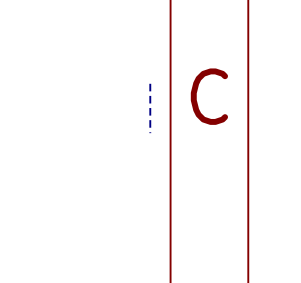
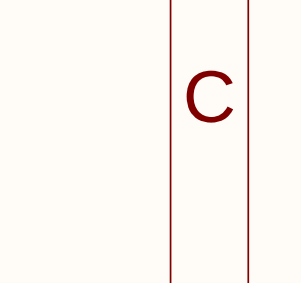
line: (150, 83) (150, 133) -> none

